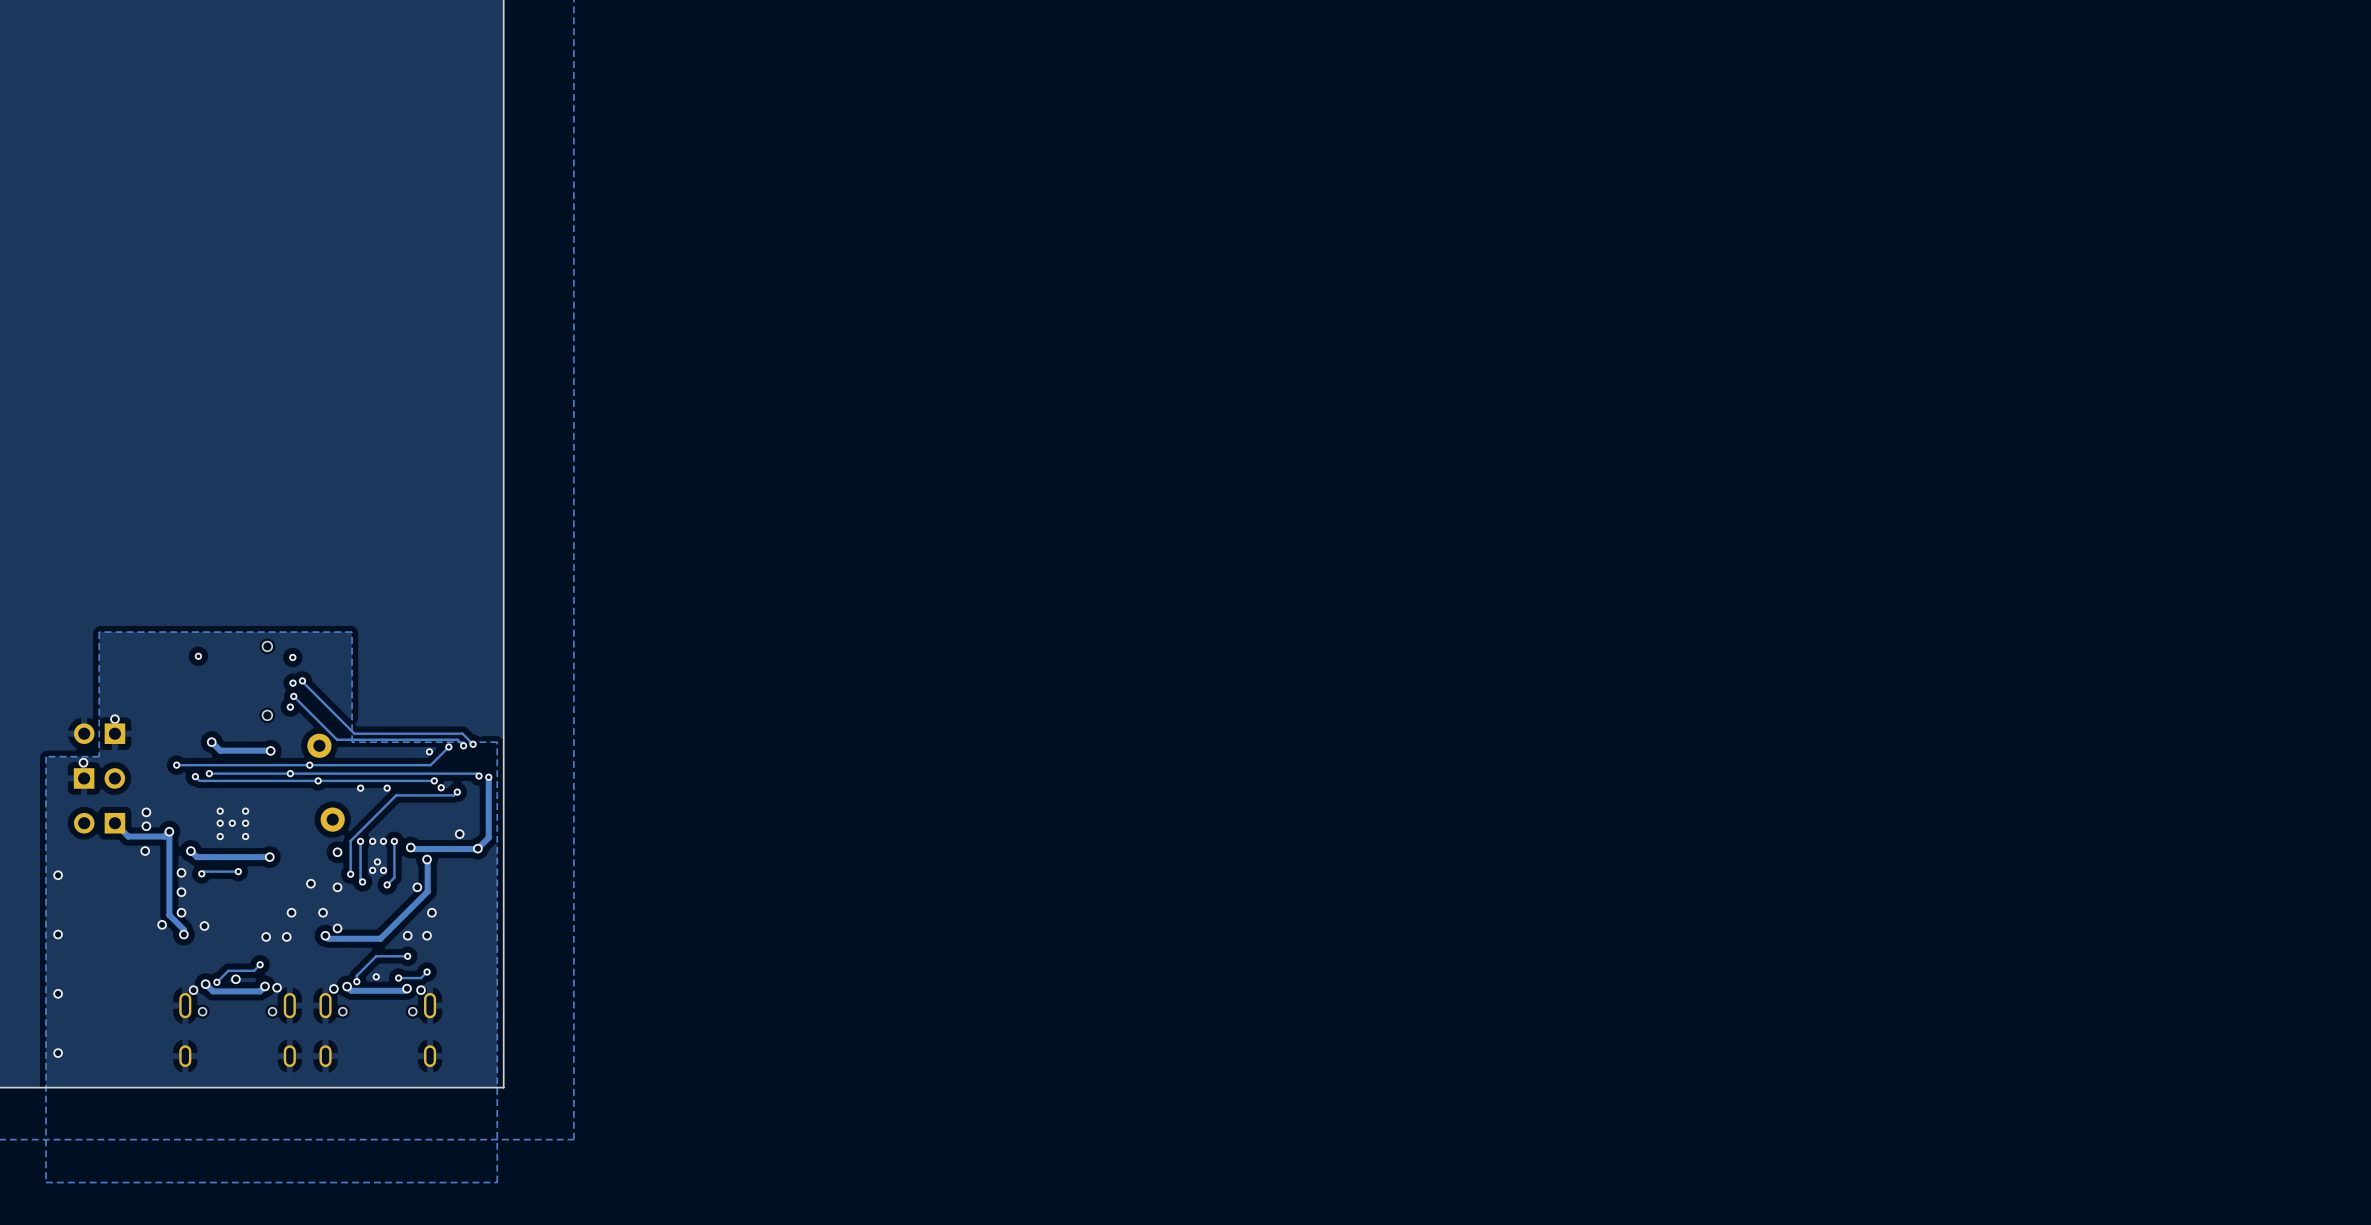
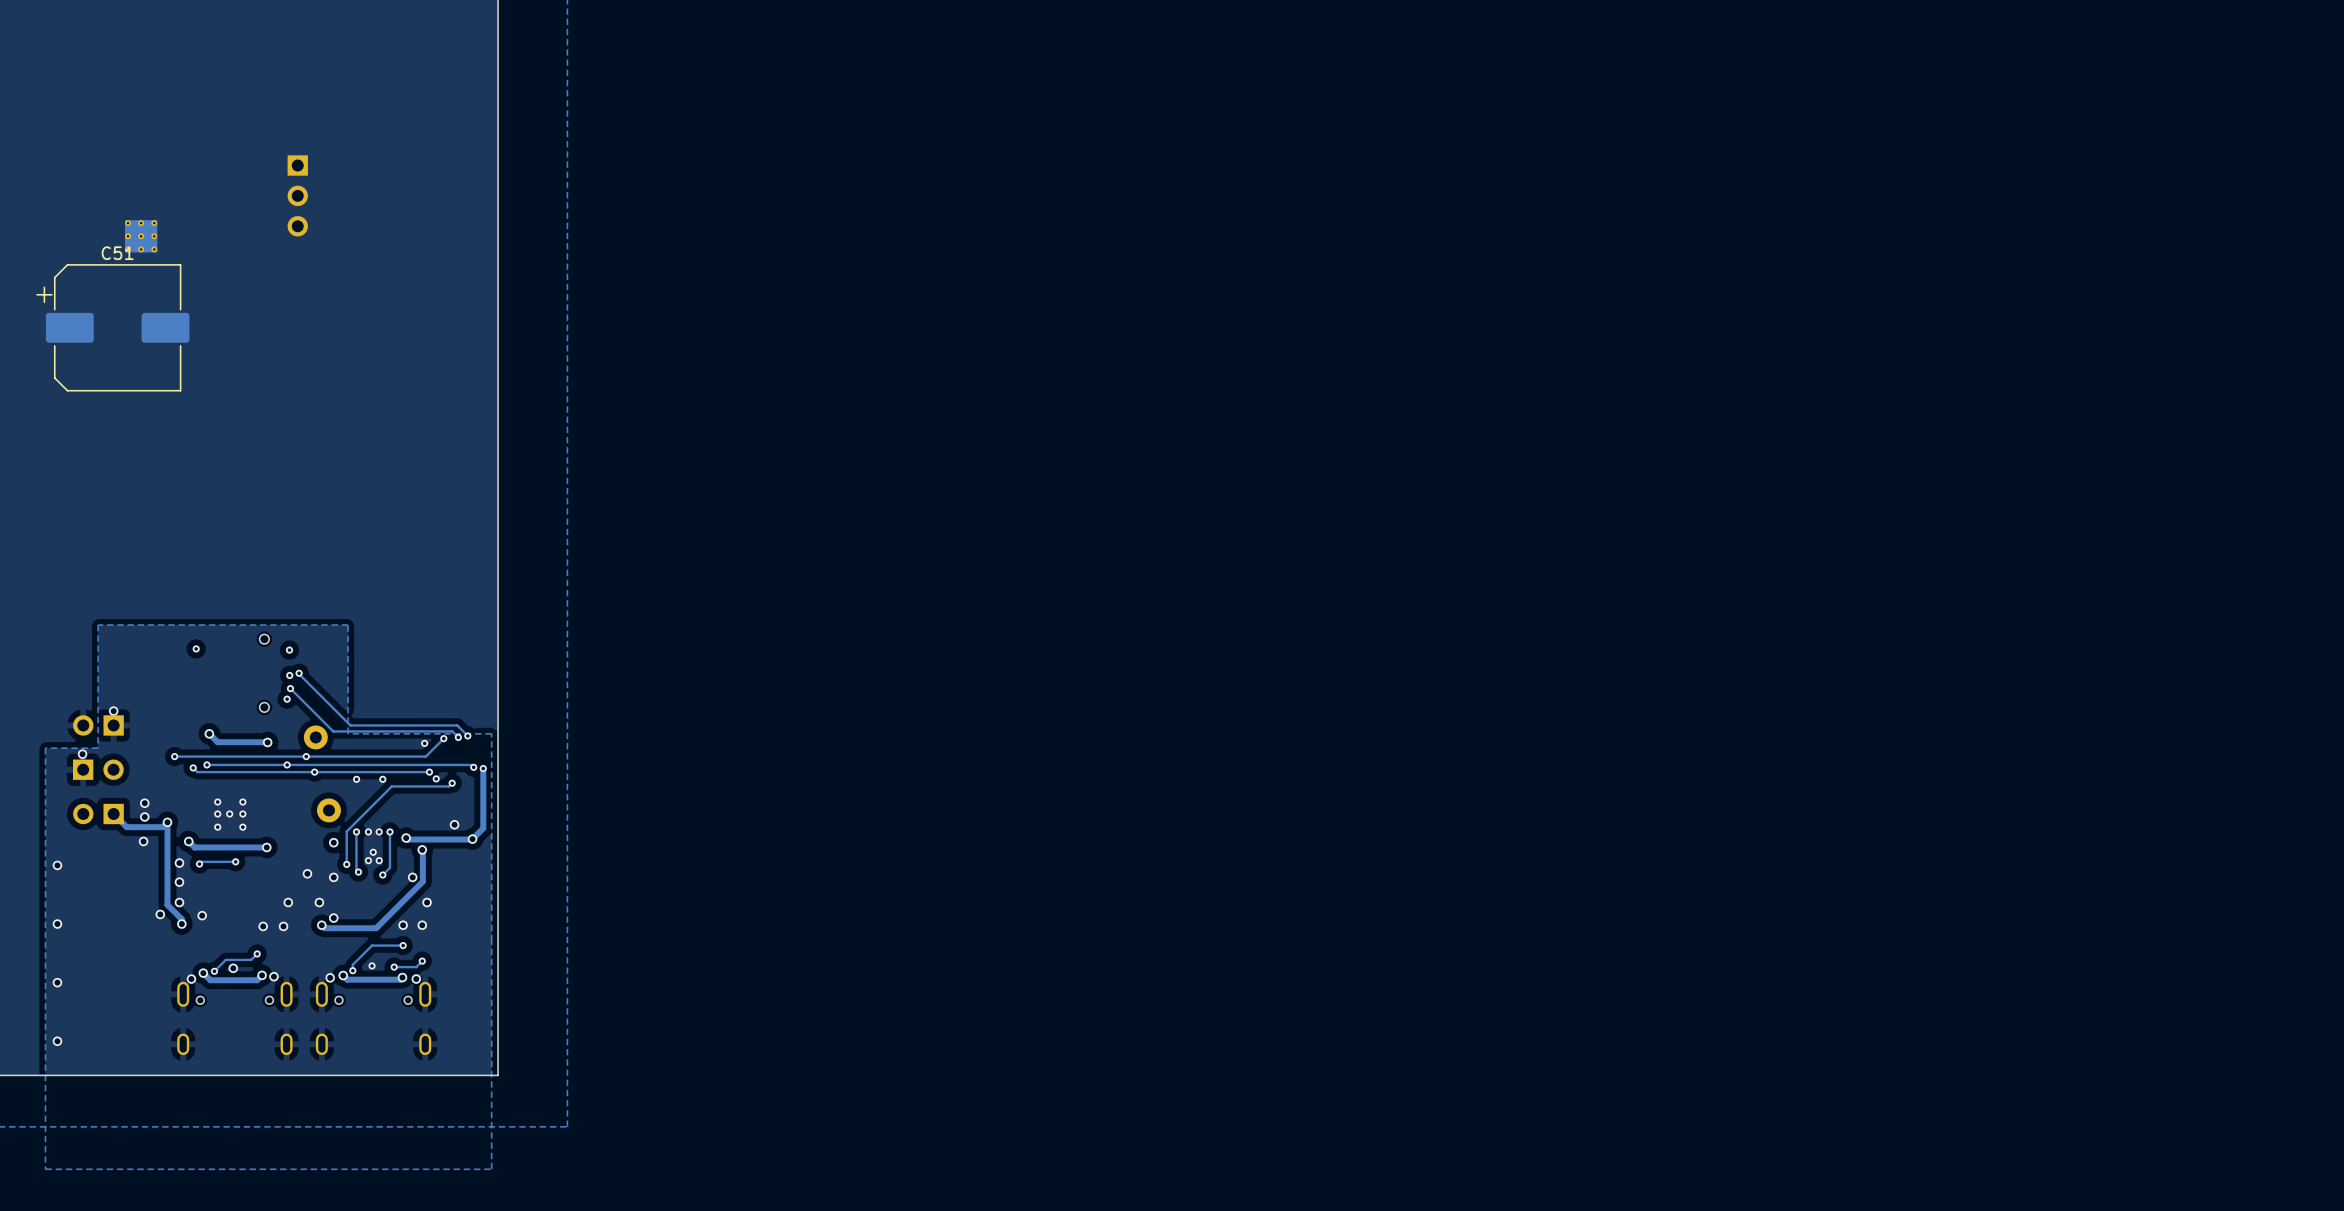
part: none -> (297, 195)
part: none -> (141, 236)
C51: none -> (112, 327)

